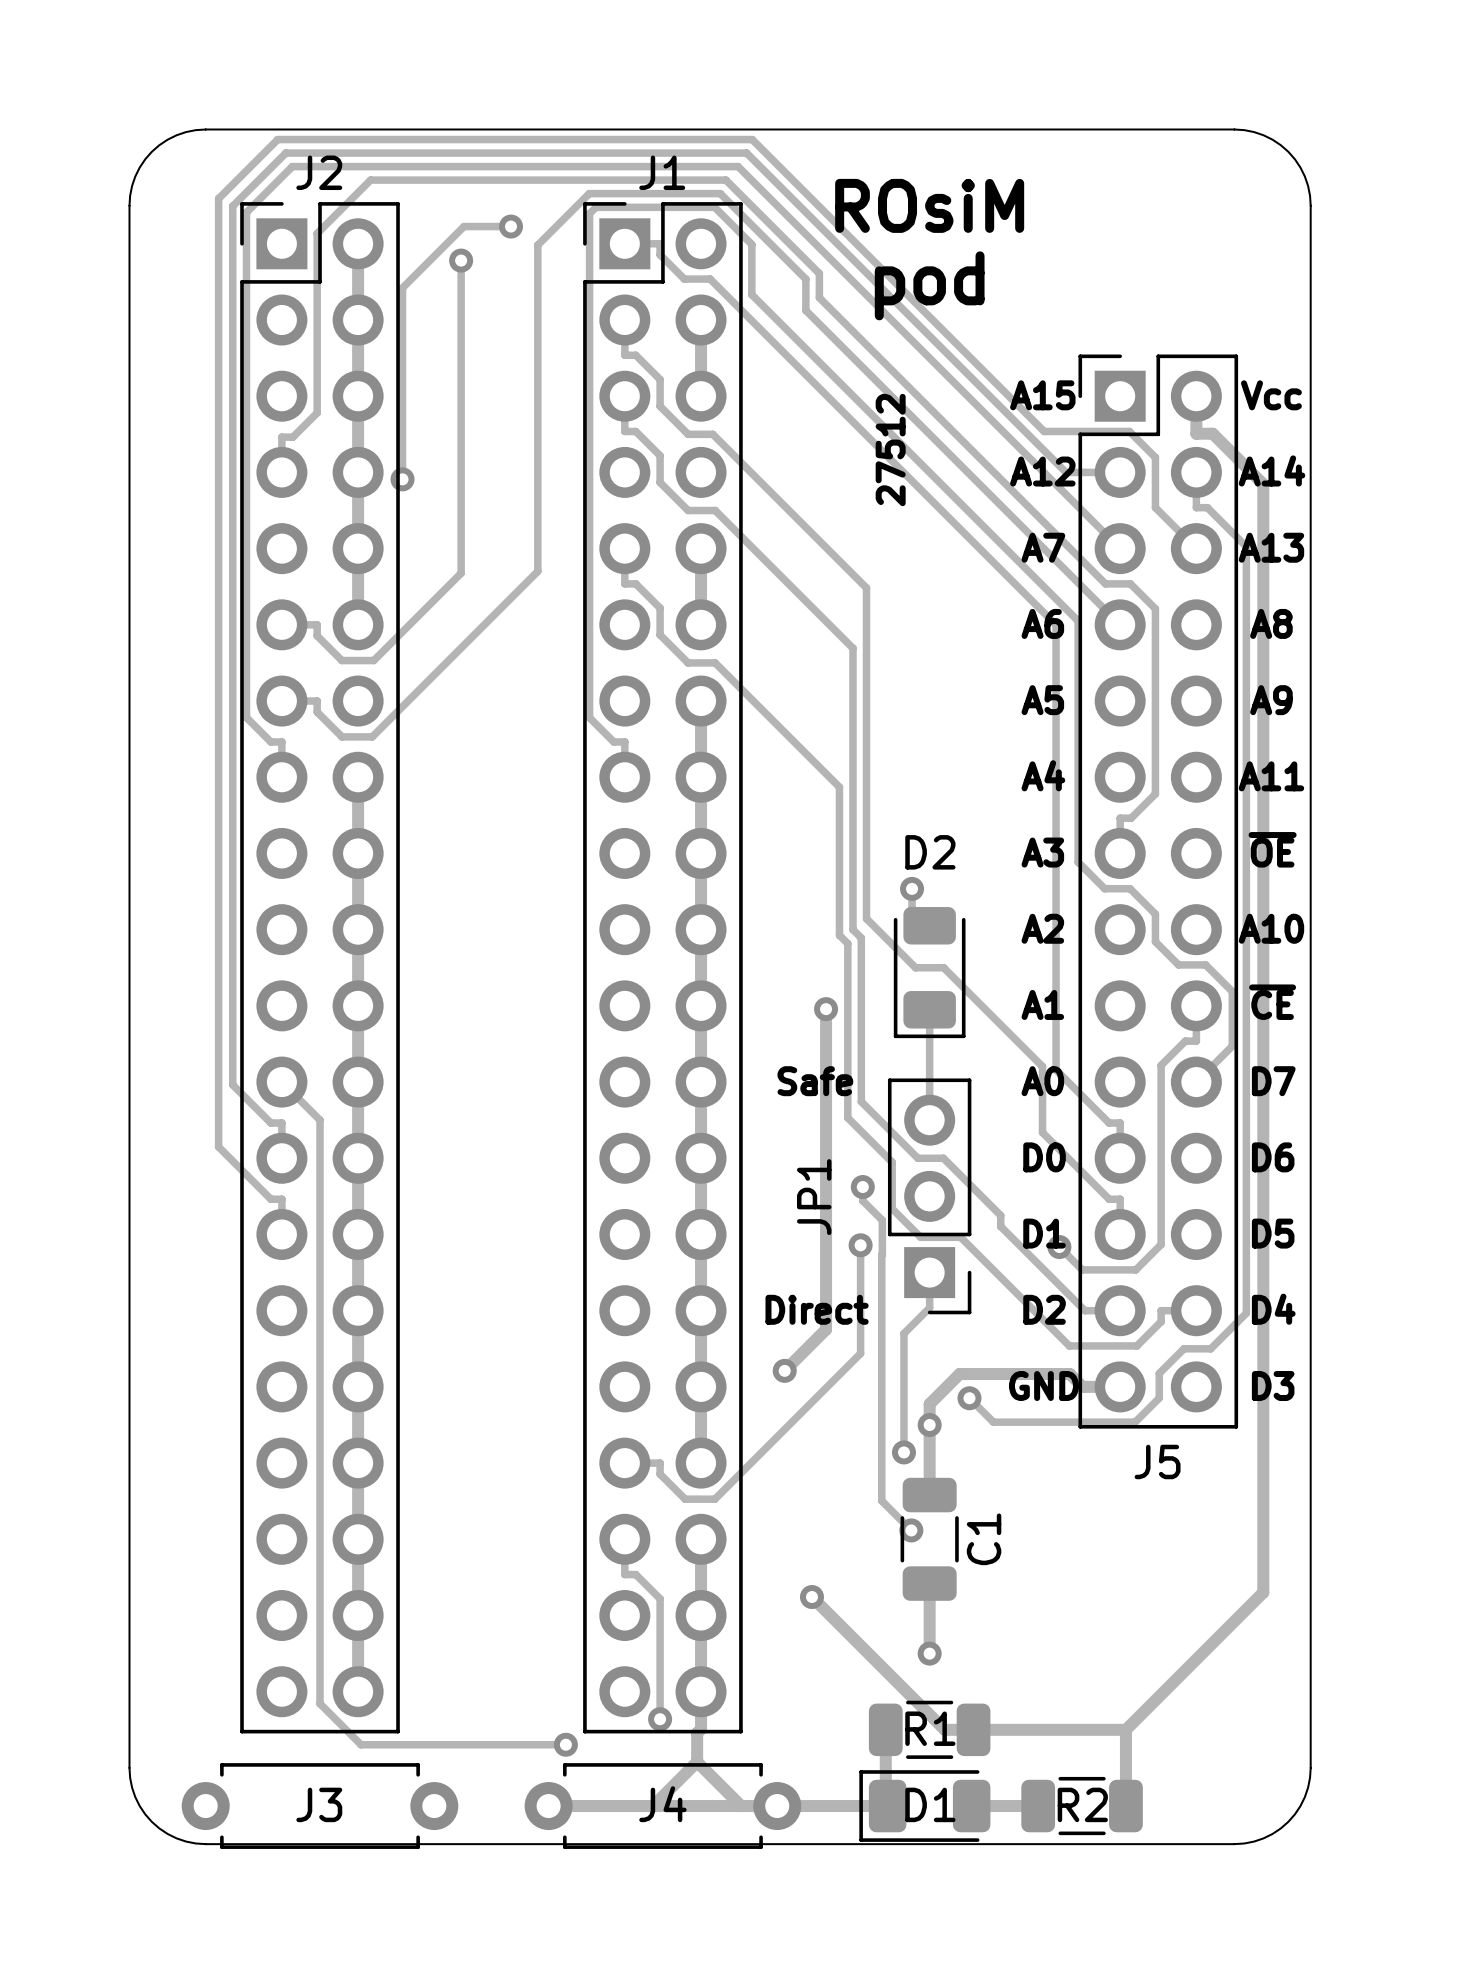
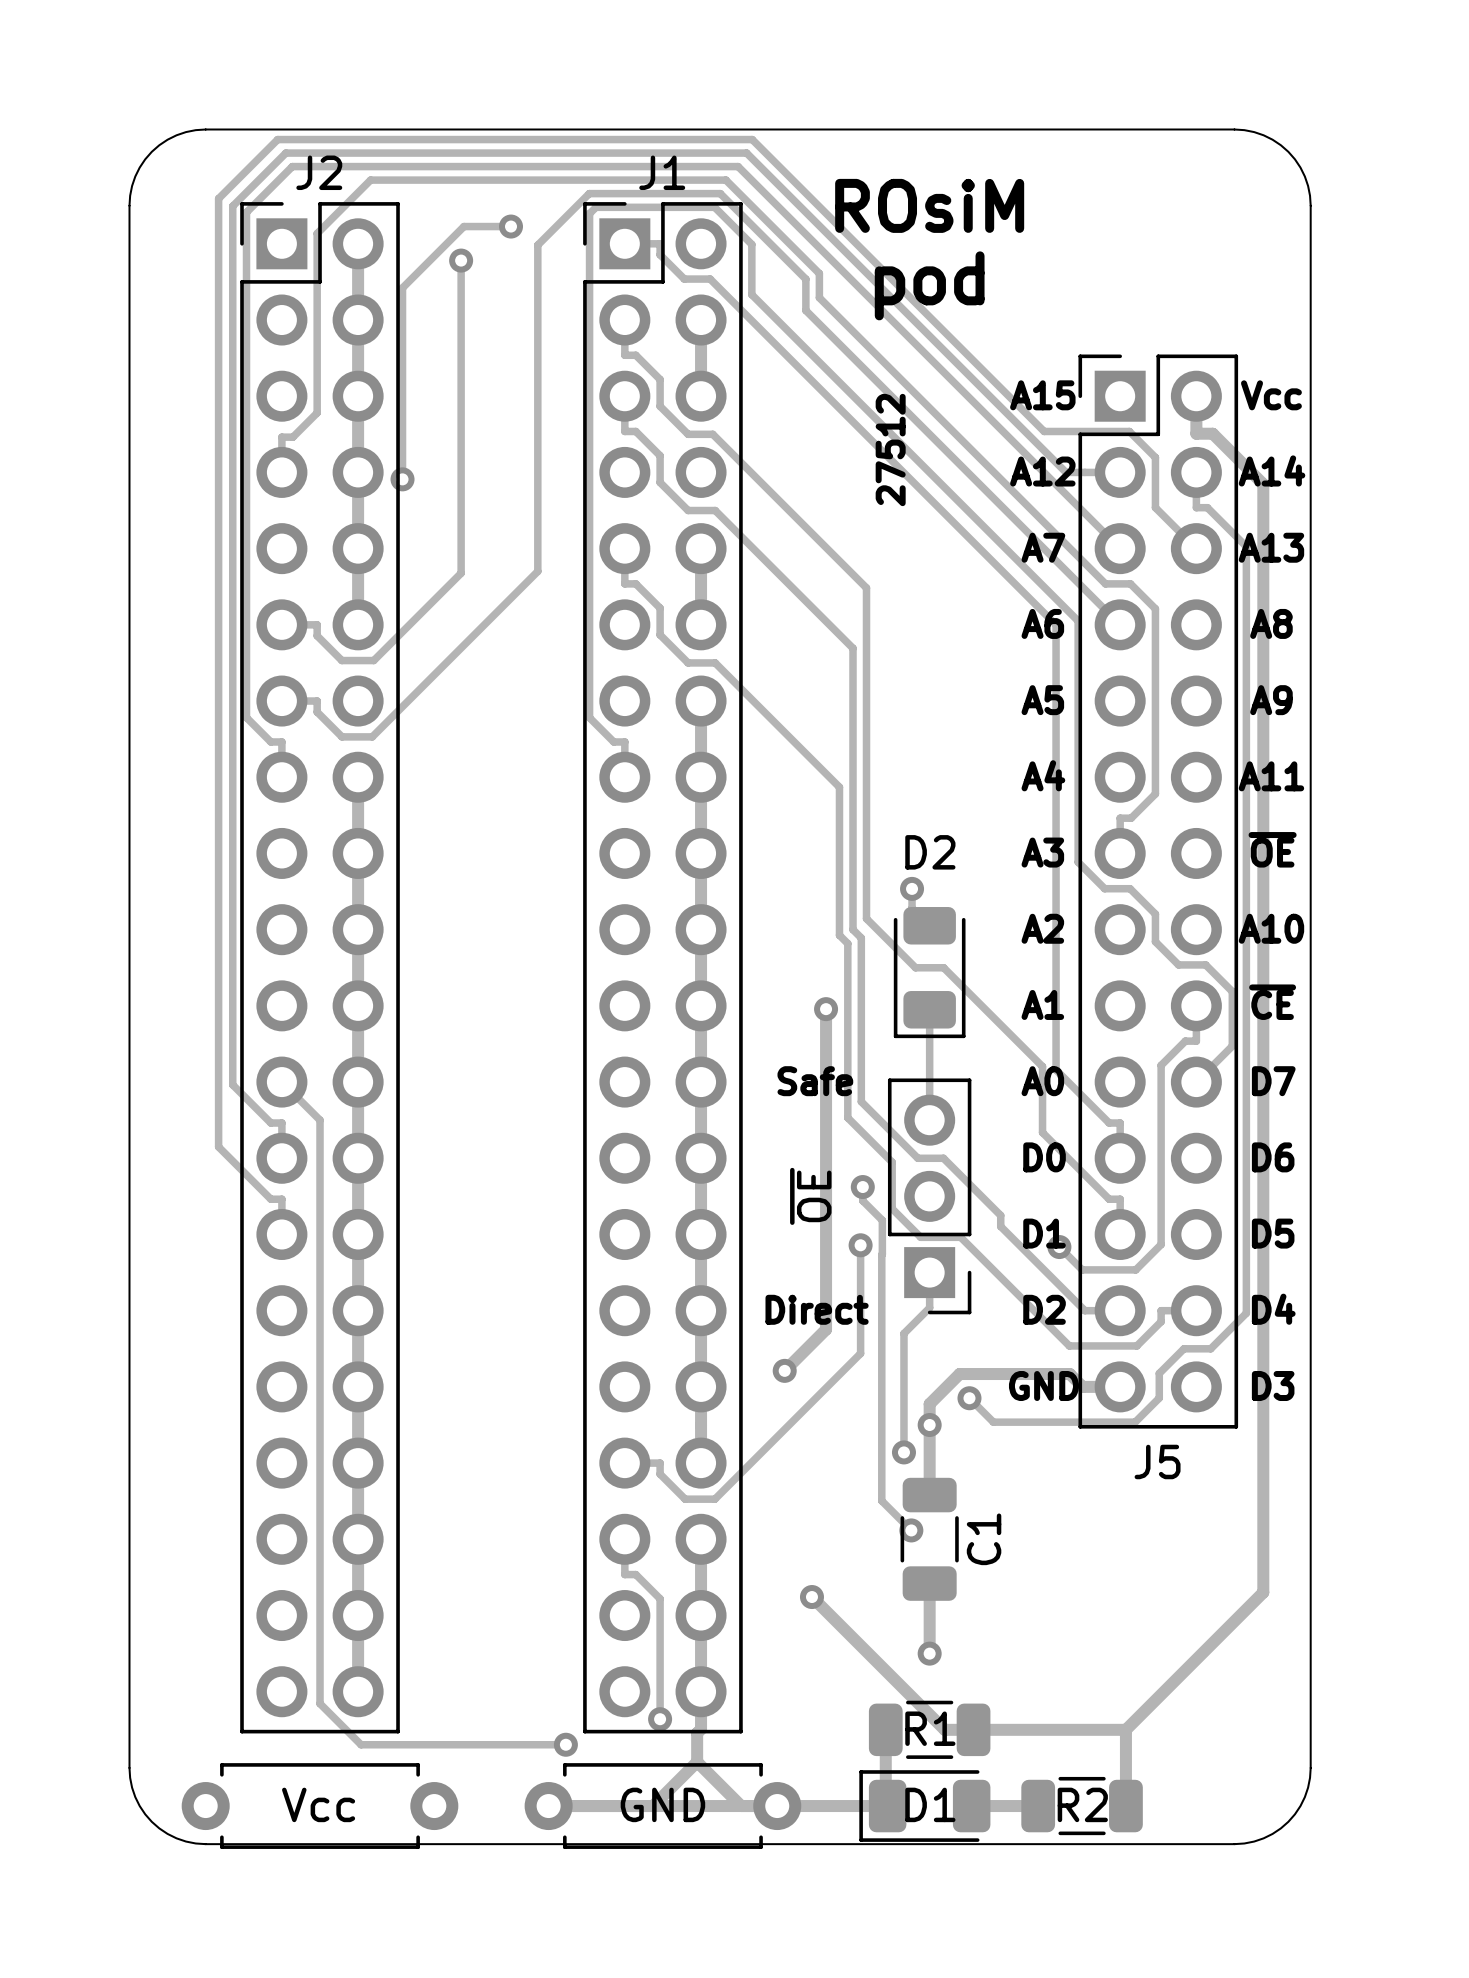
JP1 name: JP1 (814, 1197) -> ~{OE} (810, 1196)
J3 name: J3 (319, 1804) -> Vcc (318, 1804)
J4 name: J4 (662, 1804) -> GND (662, 1804)

